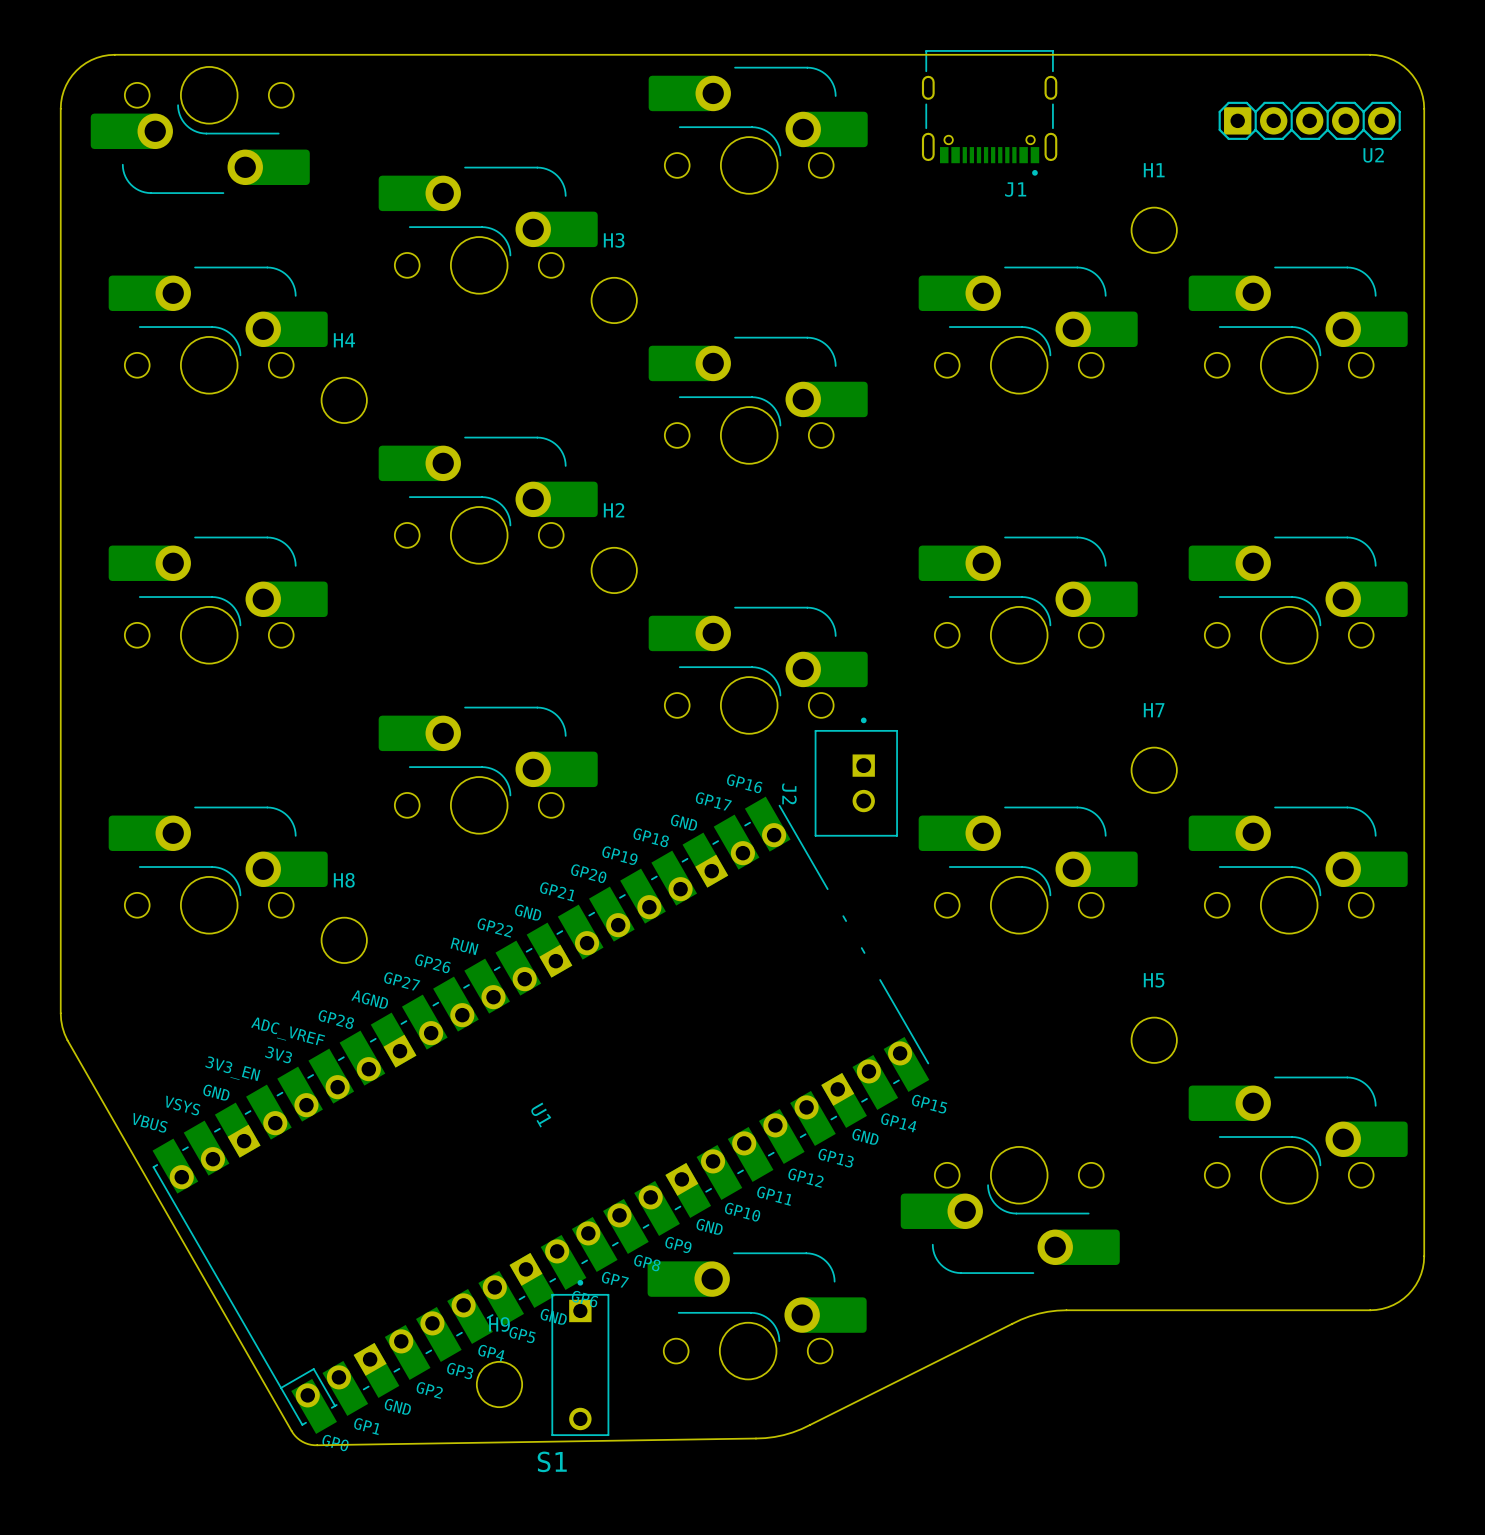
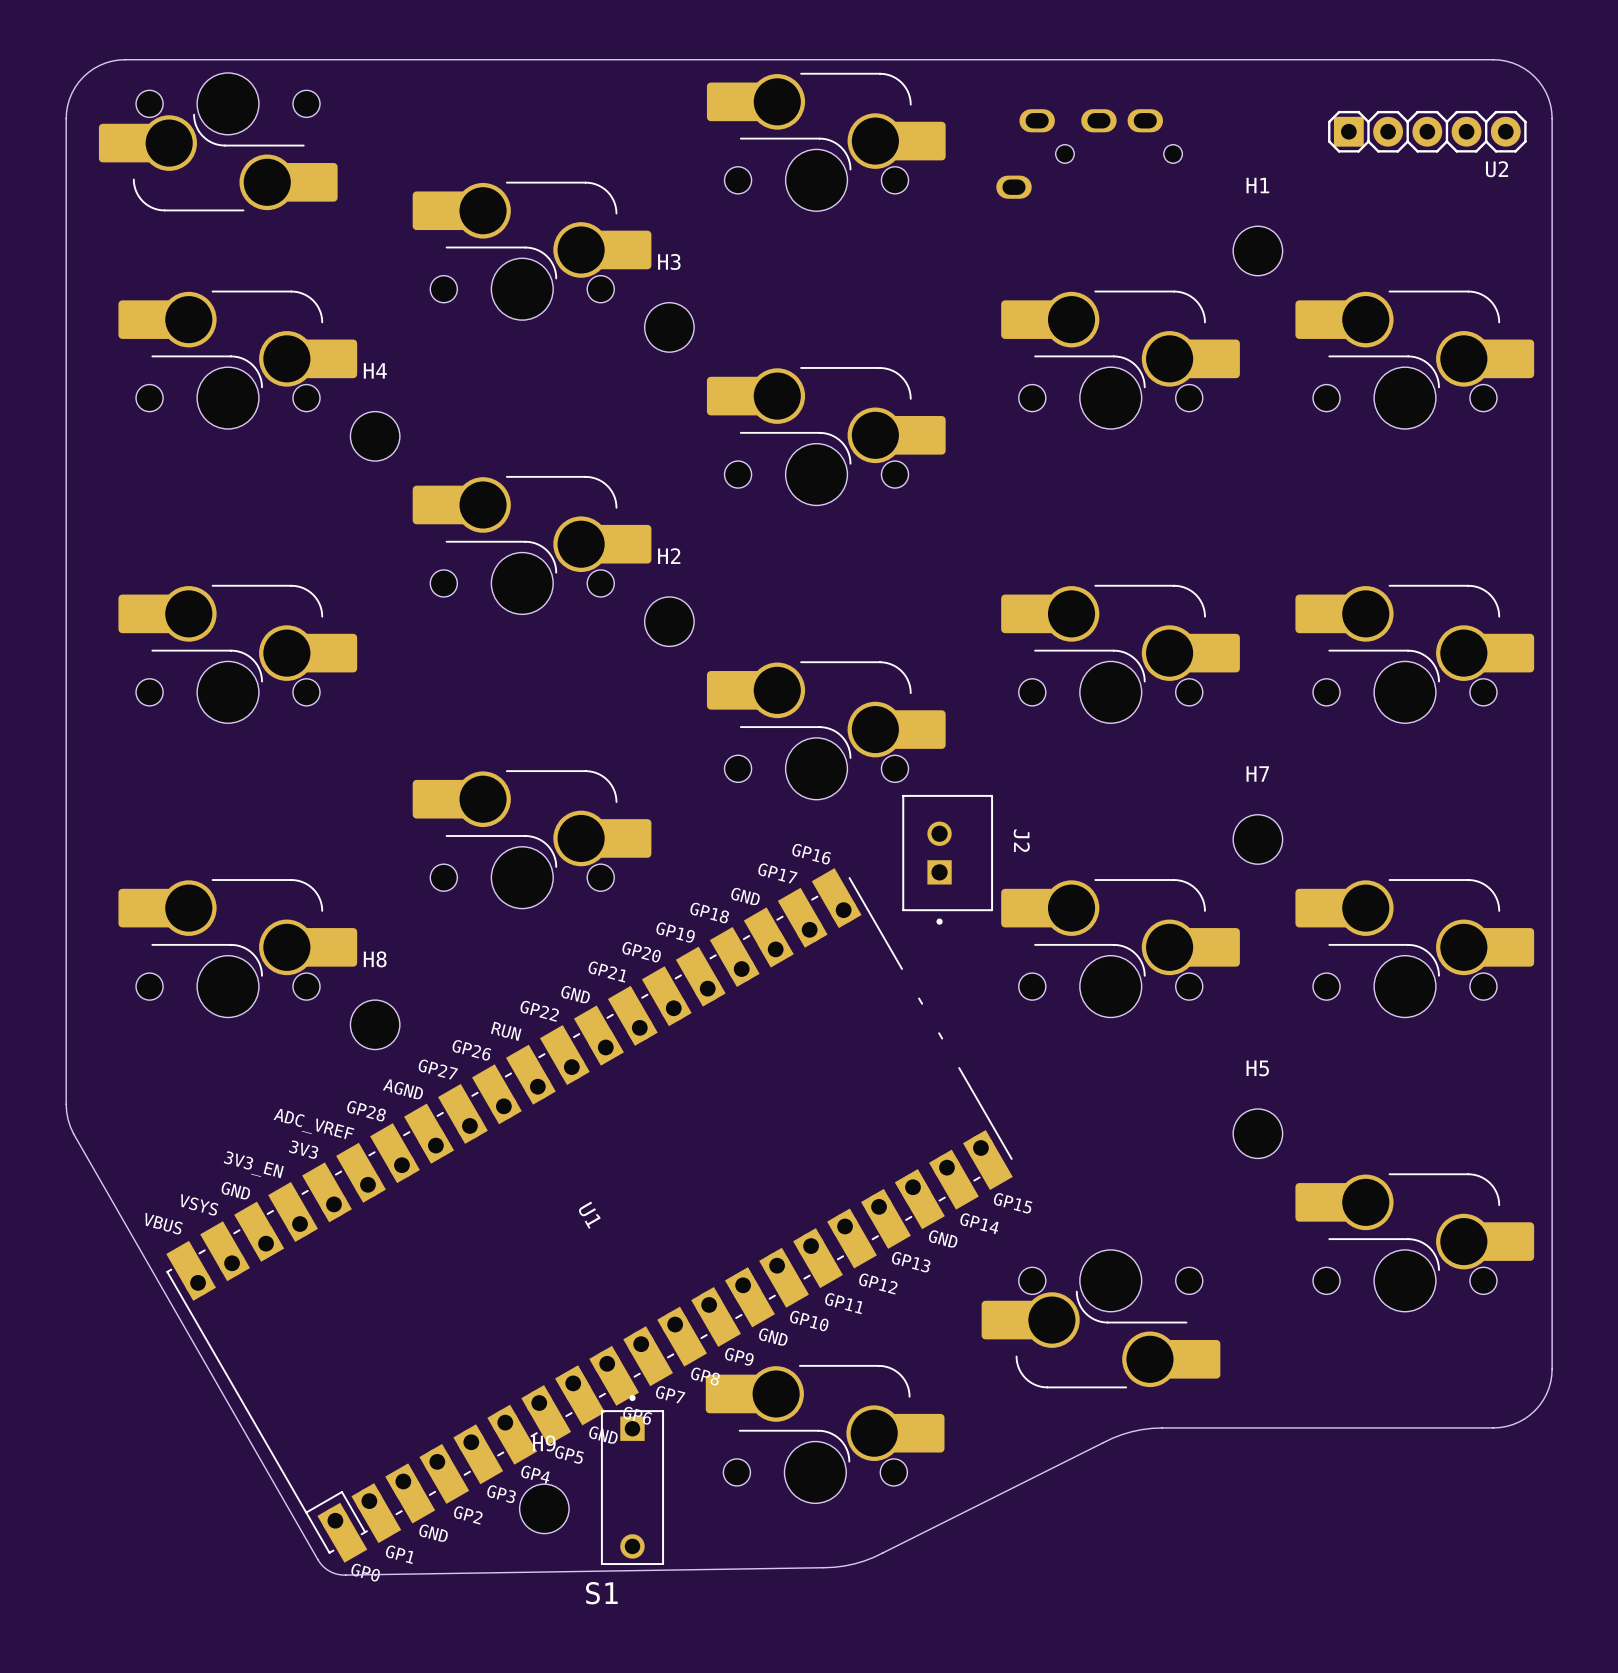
part footprint: [90, 66, 310, 194] -> [98, 72, 338, 212]
part footprint: [648, 66, 868, 194] -> [706, 72, 946, 212]
J1: (989, 112) -> none
part: none -> (1089, 153)
part footprint: [378, 166, 598, 294] -> [412, 181, 652, 321]
part footprint: [108, 266, 328, 394] -> [118, 290, 358, 429]
part footprint: [918, 266, 1138, 394] -> [1001, 290, 1240, 429]
part footprint: [1188, 266, 1408, 394] -> [1295, 290, 1535, 429]
part footprint: [648, 336, 868, 464] -> [706, 367, 946, 506]
part footprint: [378, 436, 598, 564] -> [412, 475, 652, 615]
part footprint: [108, 536, 328, 664] -> [118, 584, 358, 724]
part footprint: [918, 536, 1138, 664] -> [1001, 584, 1240, 724]
part footprint: [1188, 536, 1408, 664] -> [1295, 584, 1535, 724]
part footprint: [648, 606, 868, 734] -> [706, 661, 946, 800]
part footprint: [378, 706, 598, 834] -> [412, 770, 652, 909]
J2 rotation: 0° (856, 777) -> 180° (947, 859)
part footprint: [108, 806, 328, 934] -> [118, 879, 358, 1018]
part footprint: [918, 806, 1138, 934] -> [1001, 879, 1240, 1018]
part footprint: [1188, 806, 1408, 934] -> [1295, 879, 1535, 1018]
part footprint: [1188, 1076, 1408, 1204] -> [1295, 1173, 1535, 1312]
part footprint: [900, 1146, 1120, 1274] -> [981, 1249, 1221, 1389]
part footprint: [647, 1252, 867, 1380] -> [705, 1364, 945, 1504]

